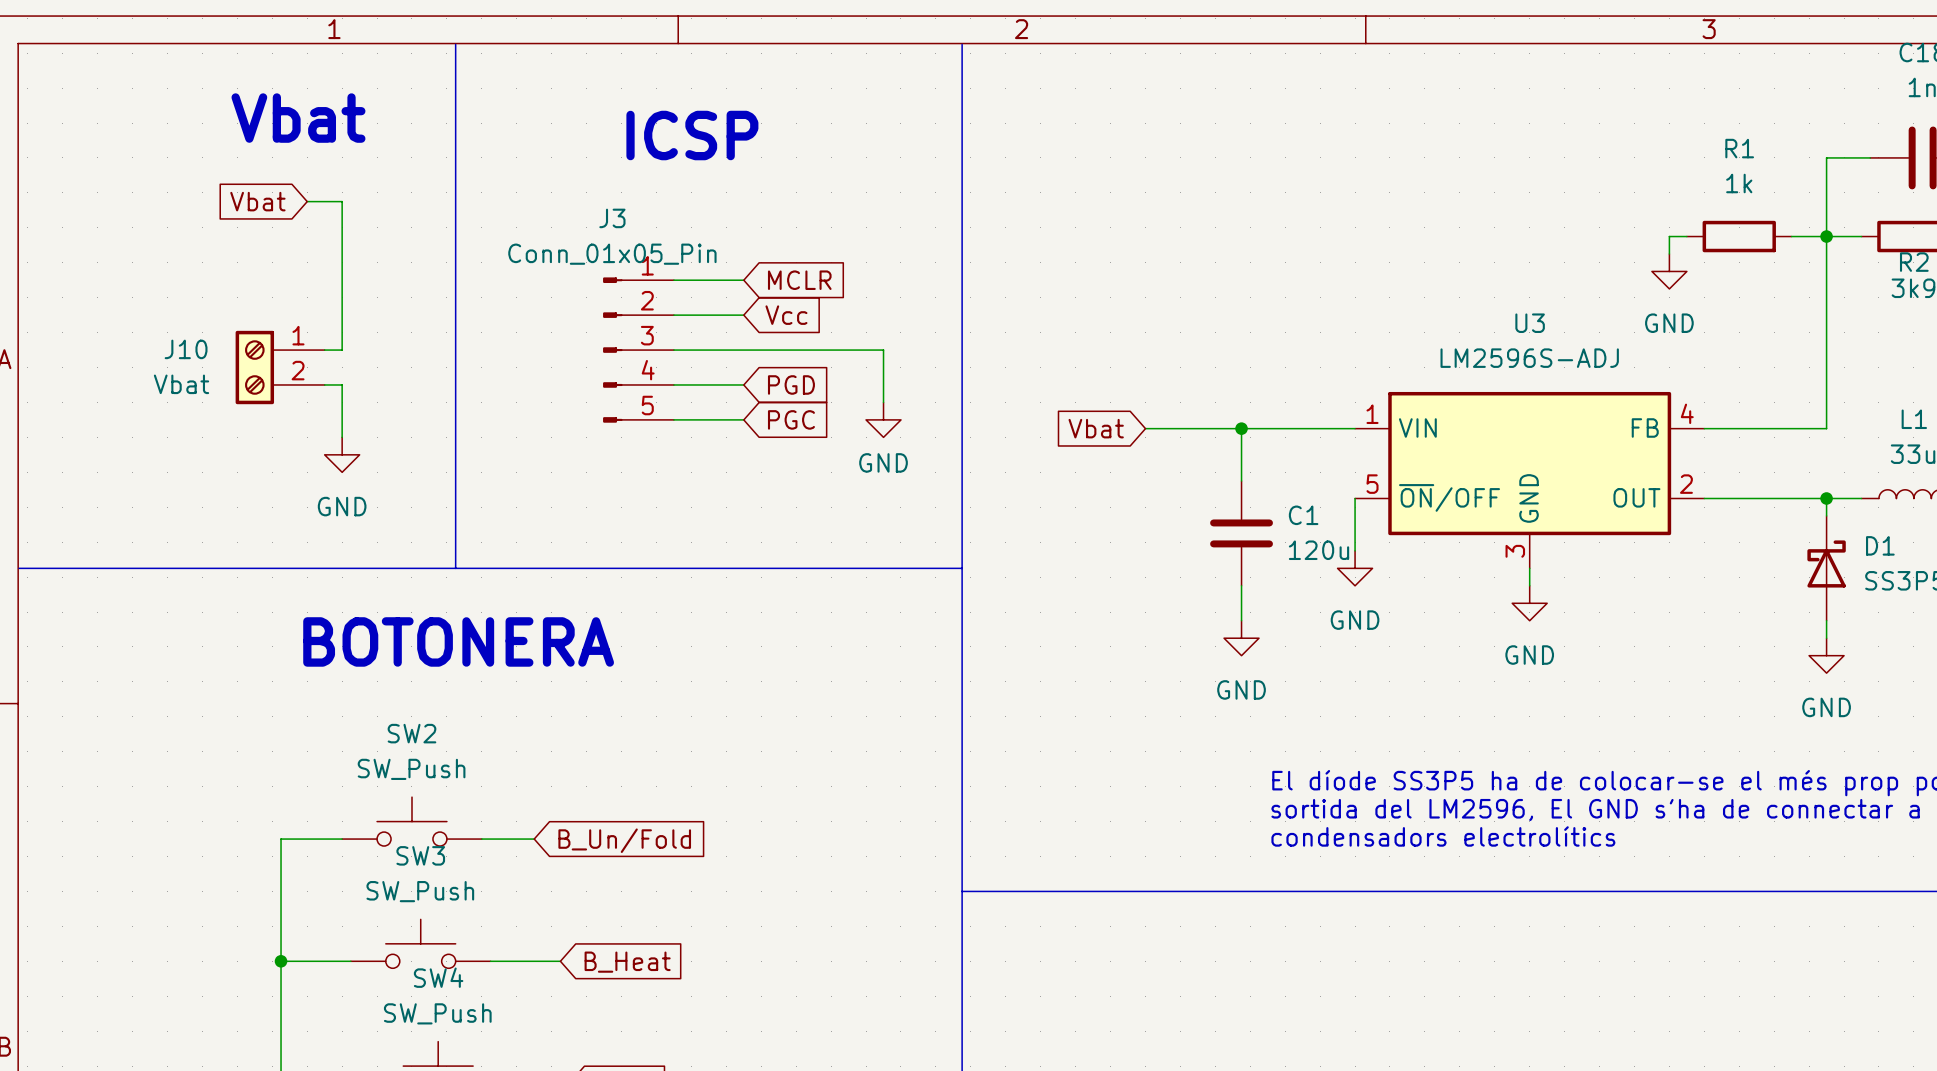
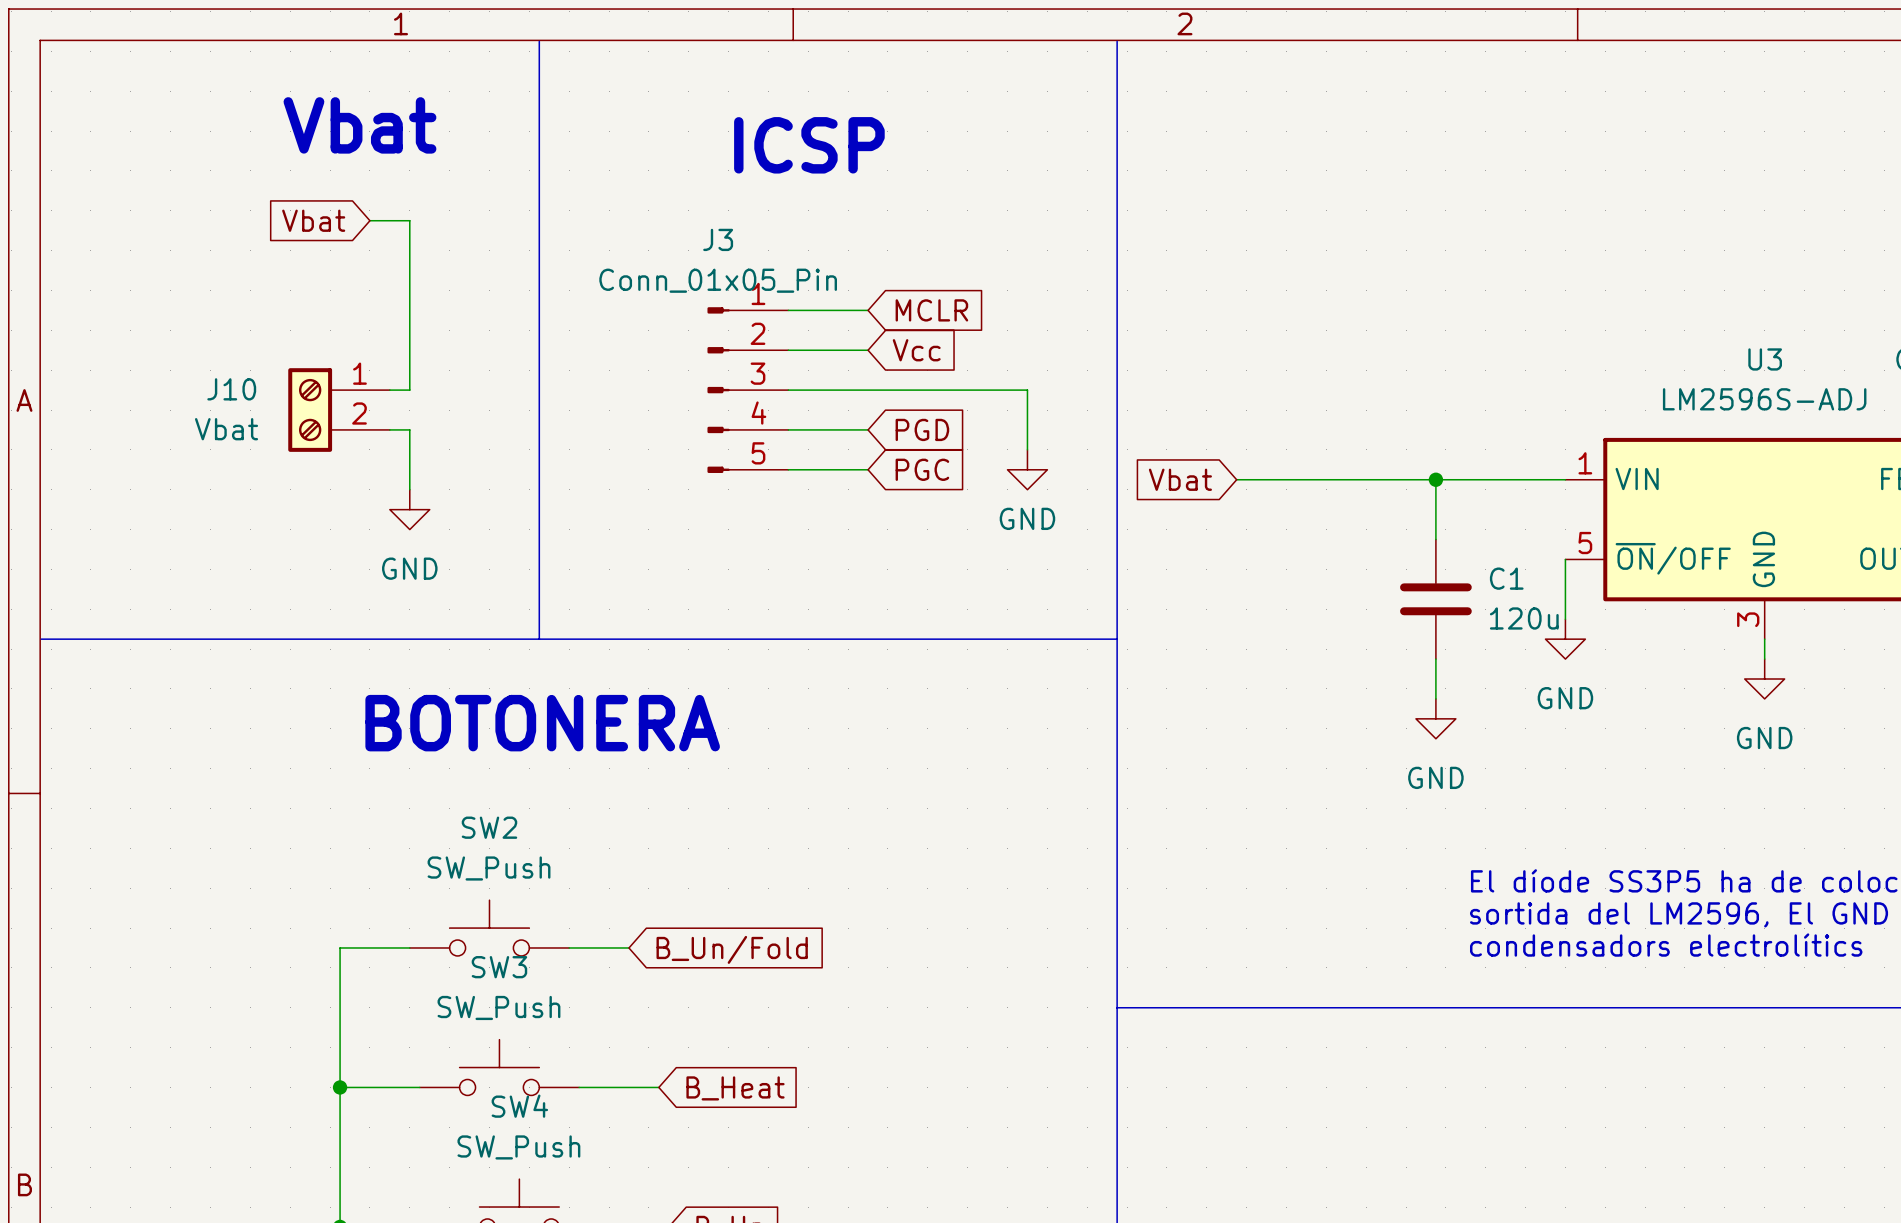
wire: none -> (1236, 479) (1326, 479)
global label position: Vbat (1096, 428) -> Vbat (1180, 479)

